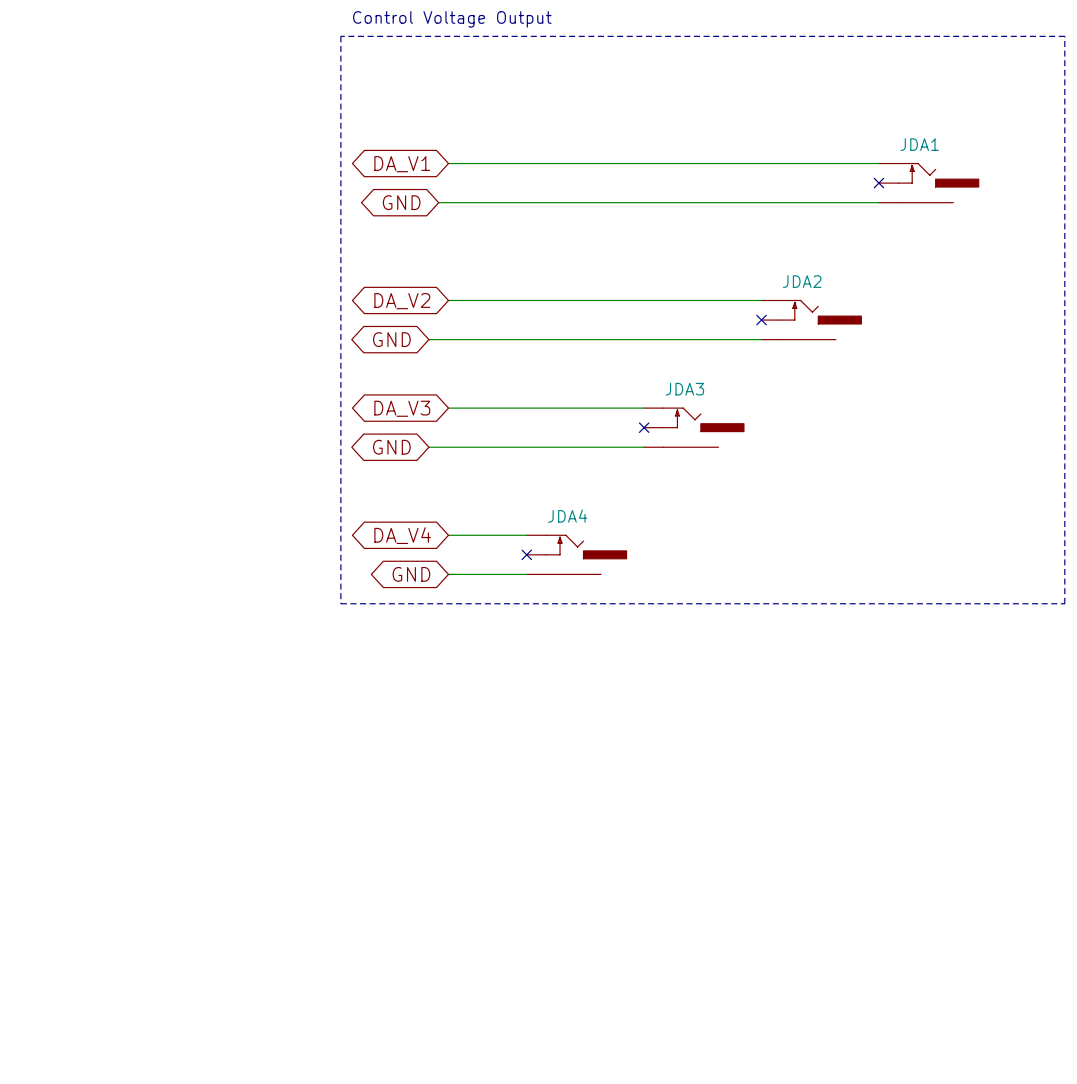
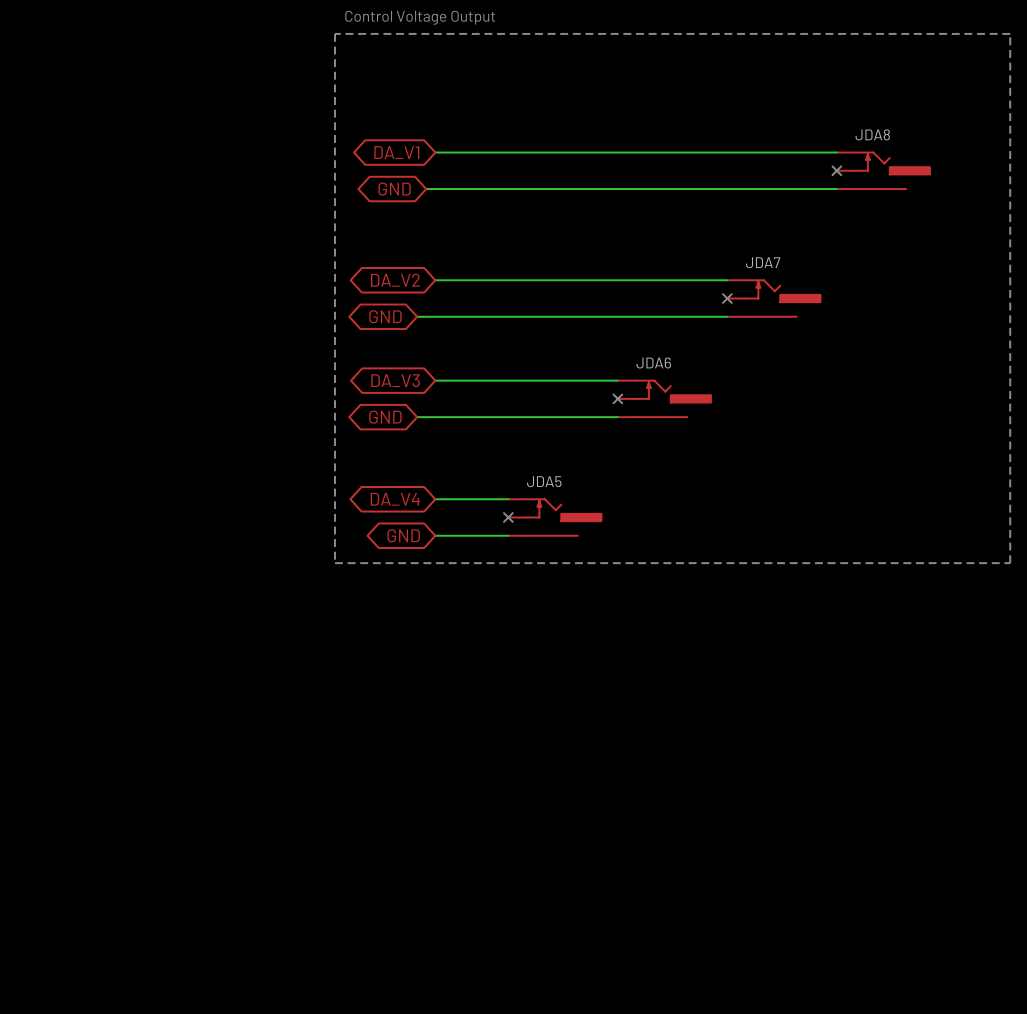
JDA1 name: JDA1 (919, 144) -> JDA8 (872, 134)
JDA2 name: JDA2 (802, 281) -> JDA7 (763, 262)
JDA3 name: JDA3 (684, 389) -> JDA6 (653, 362)
JDA4 name: JDA4 (567, 516) -> JDA5 (544, 481)

